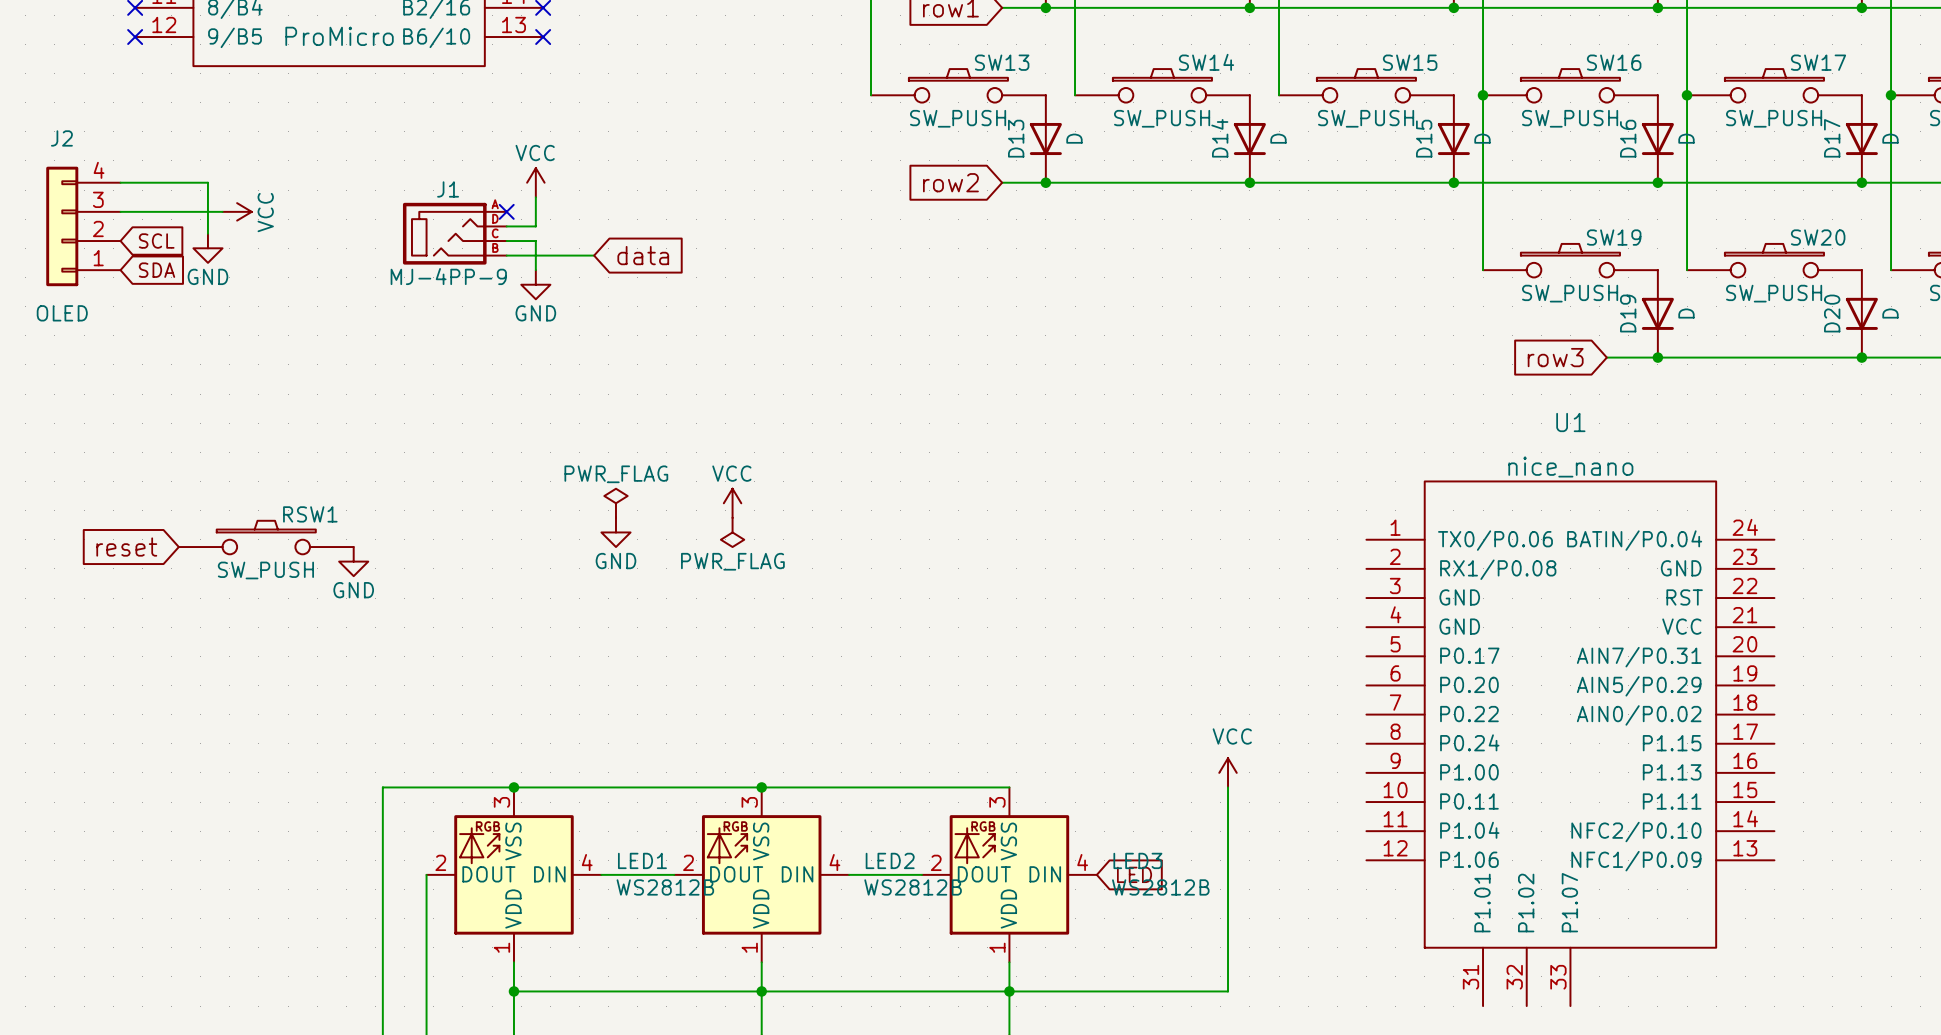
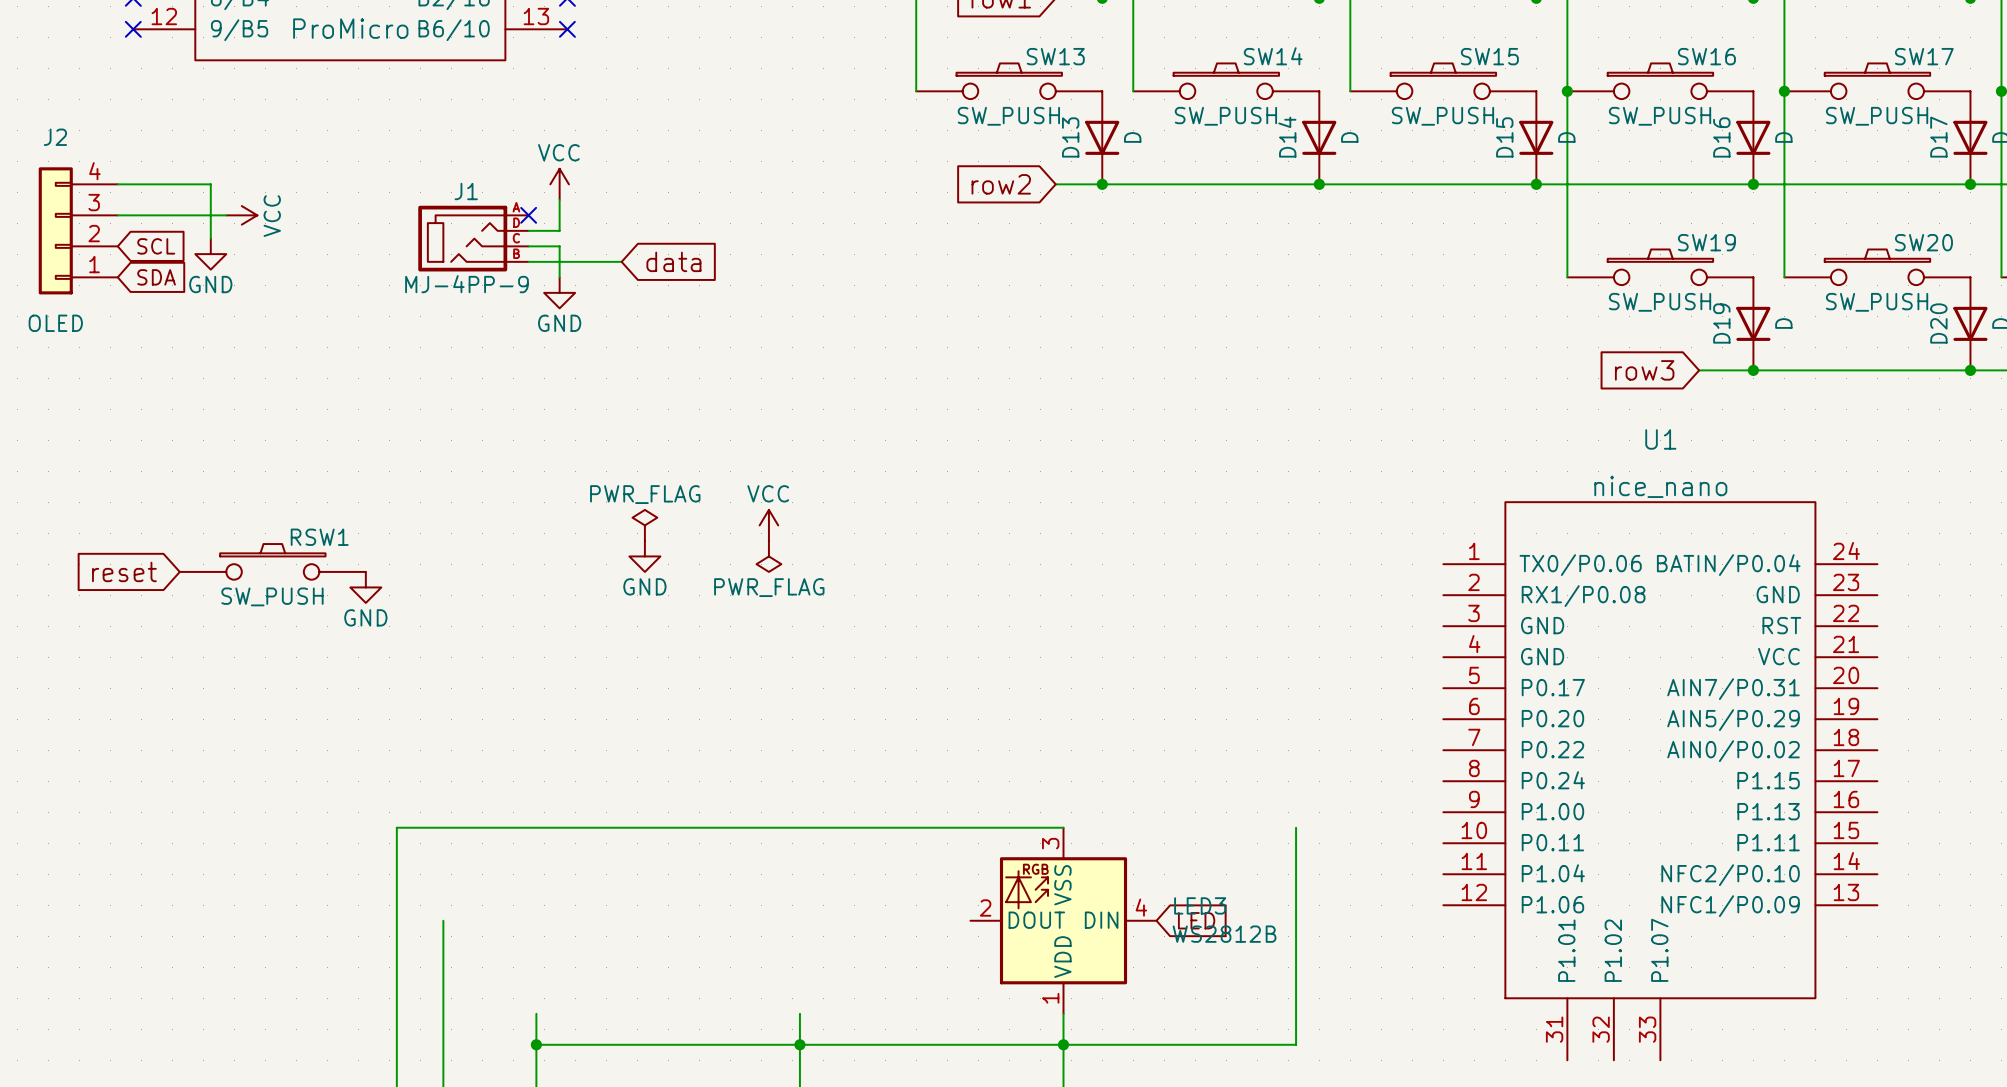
power symbol: VCC (1228, 772) -> none
junction: (513, 787) -> none
junction: (761, 787) -> none
LED1: WS2812B (513, 874) -> none
wire: (601, 874) (674, 874) -> none
LED2: WS2812B (761, 874) -> none
wire: (849, 874) (922, 874) -> none

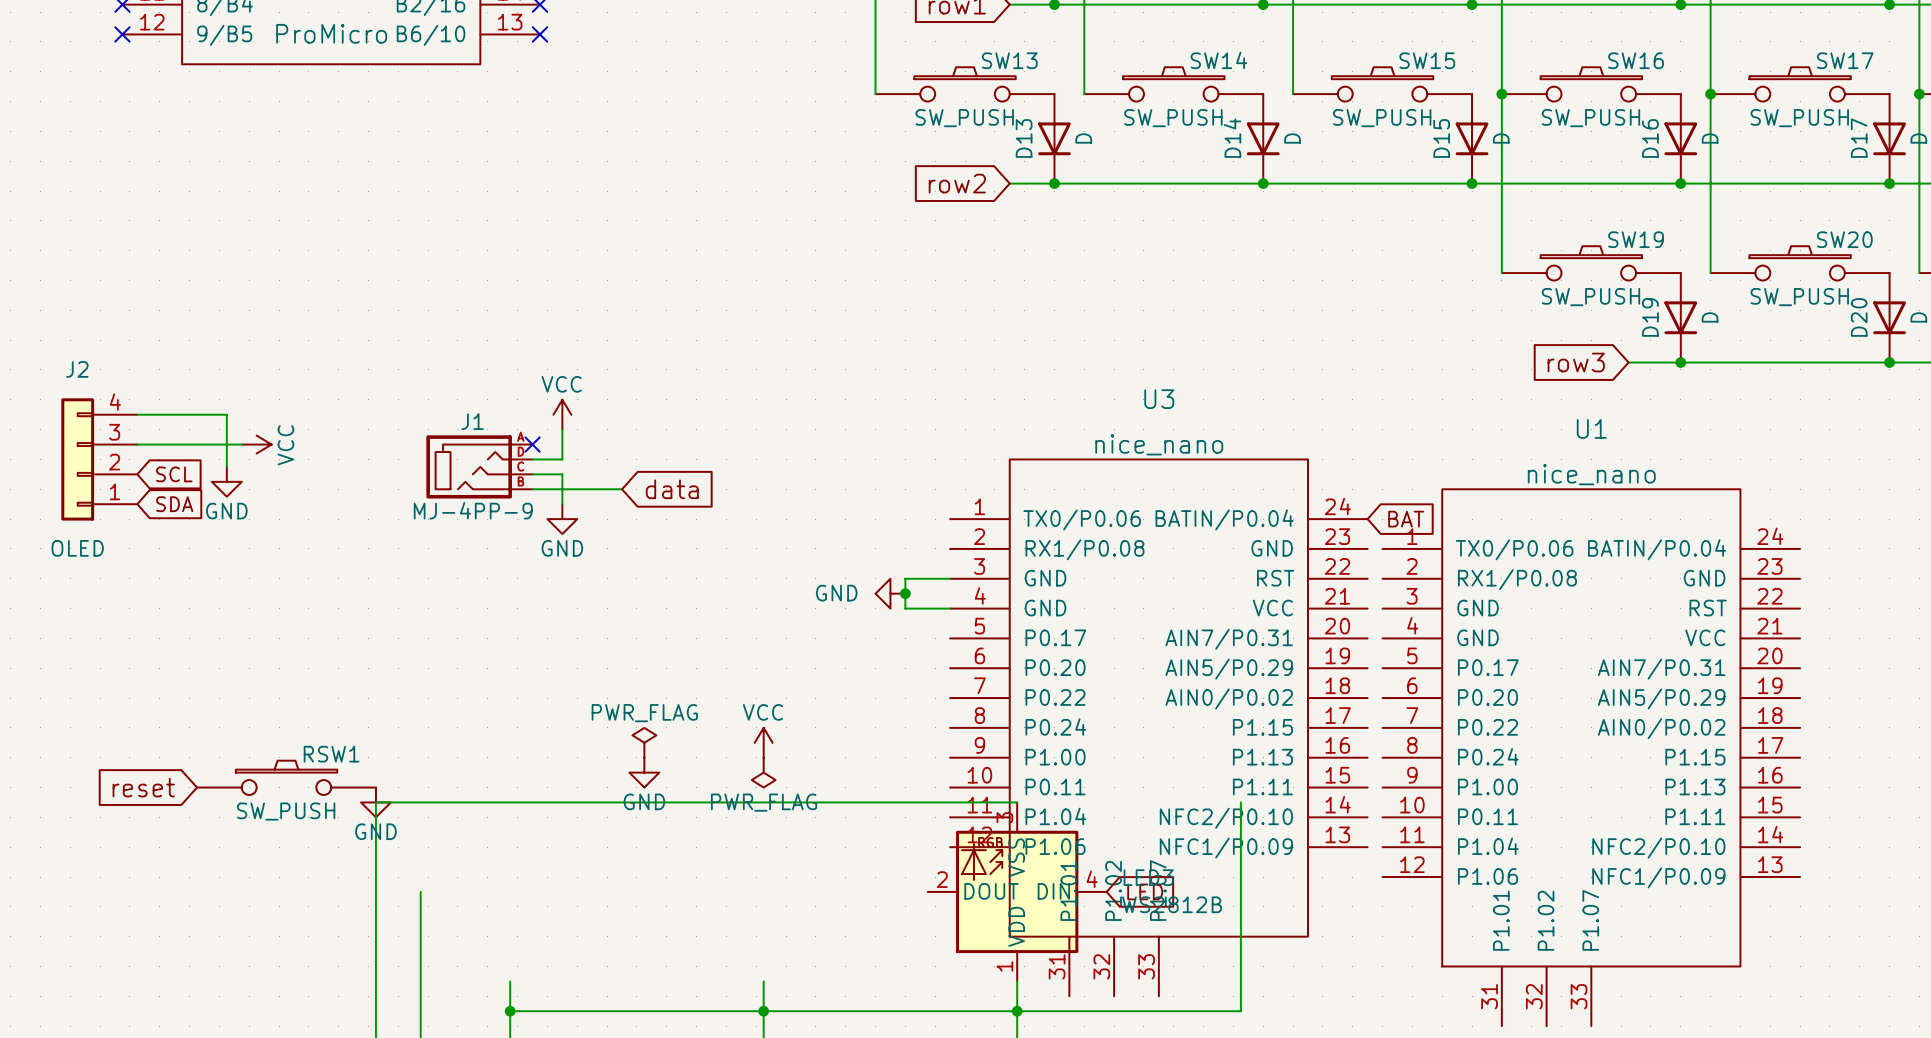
wire: (117, 184) (210, 184) (210, 238) -> (137, 414) (226, 414) (226, 466)
power symbol: VCC (559, 184) -> none
wire: (559, 199) (559, 230) (528, 230) -> (562, 429) (562, 459) (532, 459)
wire: (117, 215) (226, 215) -> (137, 444) (241, 444)
power symbol: VCC (241, 215) -> none
no-connect mark: (528, 215) -> none
J2 position: (78, 230) -> (99, 459)
J1 position: (473, 238) -> (479, 466)
global label position: SCL (156, 246) -> SCL (174, 474)
wire: (528, 246) (559, 246) (559, 277) -> (532, 474) (562, 474) (562, 504)
power symbol: GND (210, 254) -> none
wire: (528, 261) (621, 261) -> (532, 489) (622, 489)
global label position: data (673, 261) -> data (672, 489)
global label position: SDA (156, 277) -> SDA (174, 504)
power symbol: GND (559, 292) -> none
power symbol: none -> VCC (562, 414)
power symbol: none -> VCC (256, 444)
no-connect mark: none -> (532, 444)
power symbol: none -> GND (226, 481)
power symbol: PWR_FLAG (644, 525) -> none
power symbol: VCC (768, 525) -> none
global label: none -> BAT (1406, 519)
power symbol position: GND (644, 556) -> GND (562, 519)
power symbol: PWR_FLAG (768, 556) -> none
RSW1 position: (272, 561) -> (286, 777)
global label position: reset (124, 571) -> reset (143, 787)
power symbol: GND (365, 587) -> none
wire: none -> (950, 578) (905, 578) (905, 608) (950, 608)
power symbol: none -> GND (890, 593)
junction: none -> (905, 593)
U3: none -> nice_nano (1158, 727)
power symbol: none -> PWR_FLAG (644, 742)
power symbol: none -> VCC (763, 742)
power symbol: none -> GND (644, 772)
power symbol: none -> PWR_FLAG (763, 772)
power symbol: none -> GND (375, 802)

